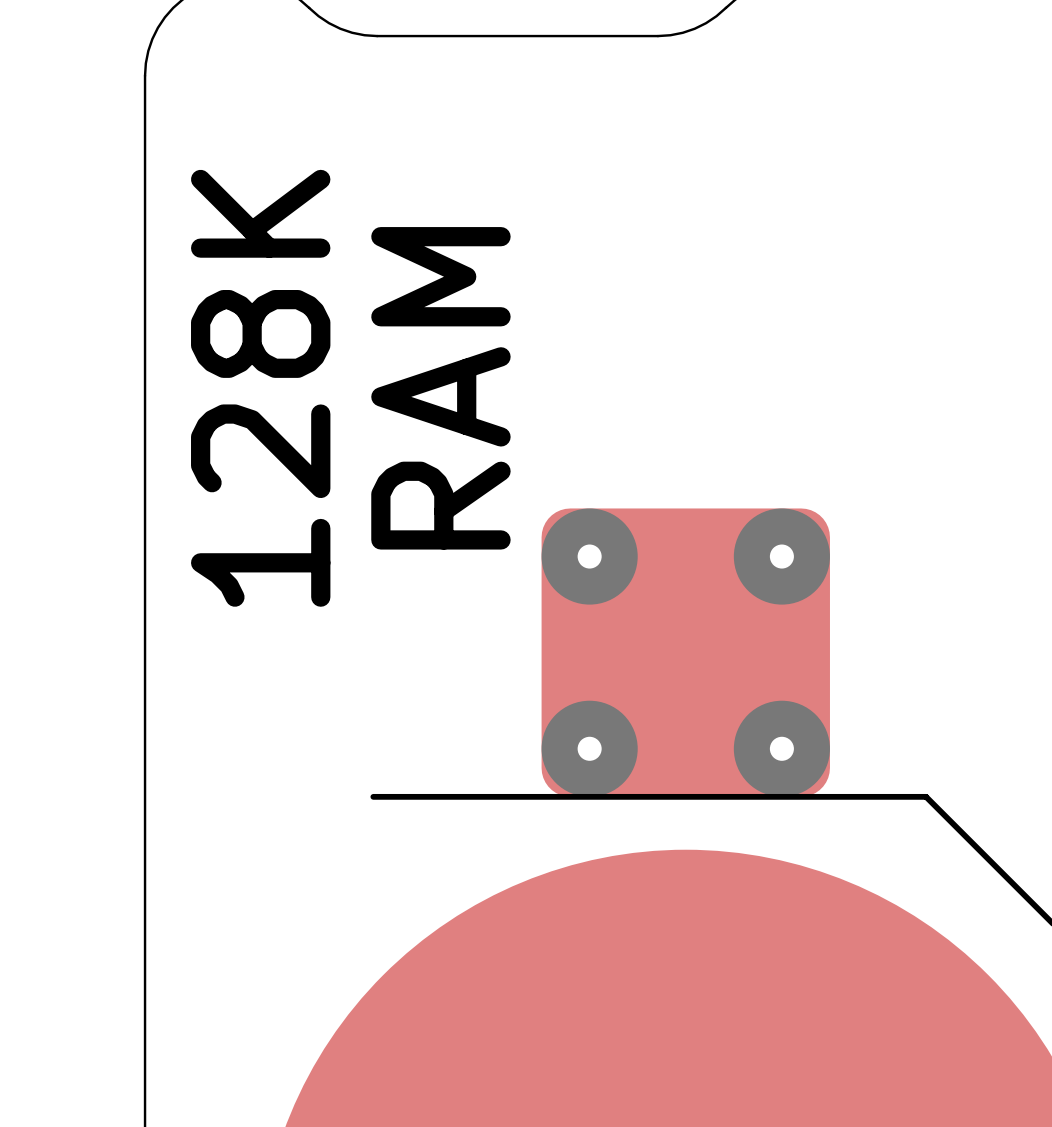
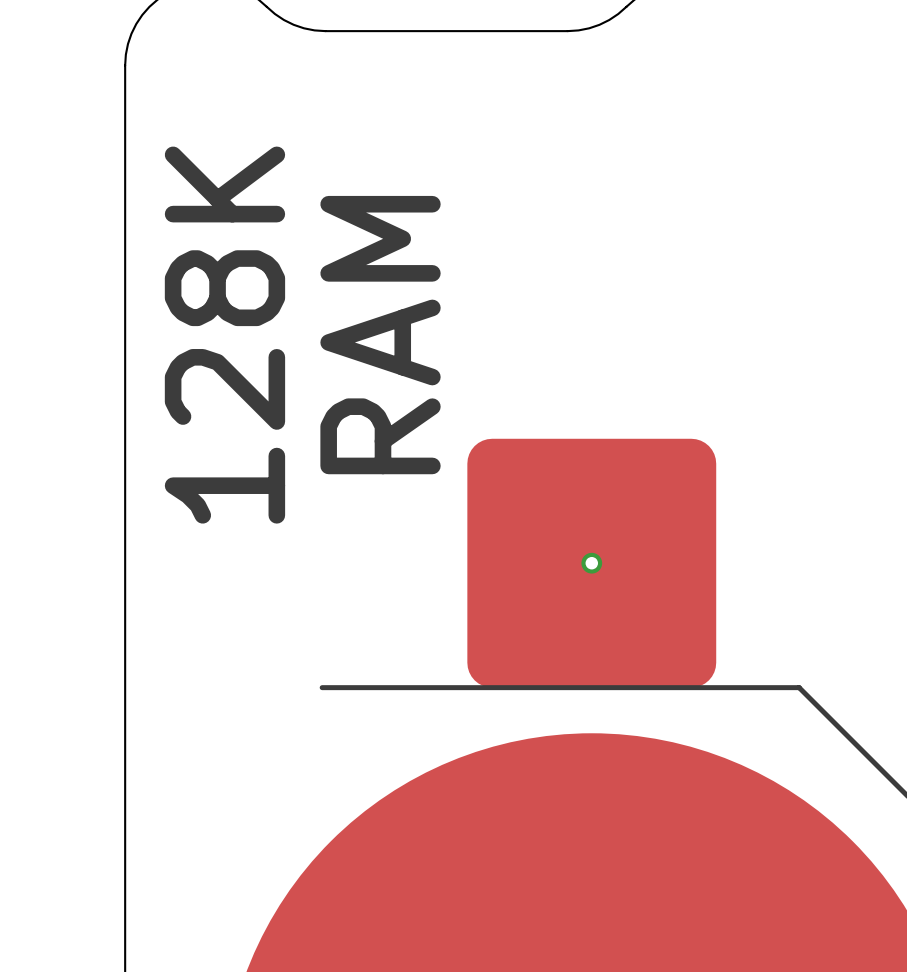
via: (589, 556) -> none
via: (781, 556) -> none
via: none -> (591, 563)
via: (589, 748) -> none
via: (781, 748) -> none

